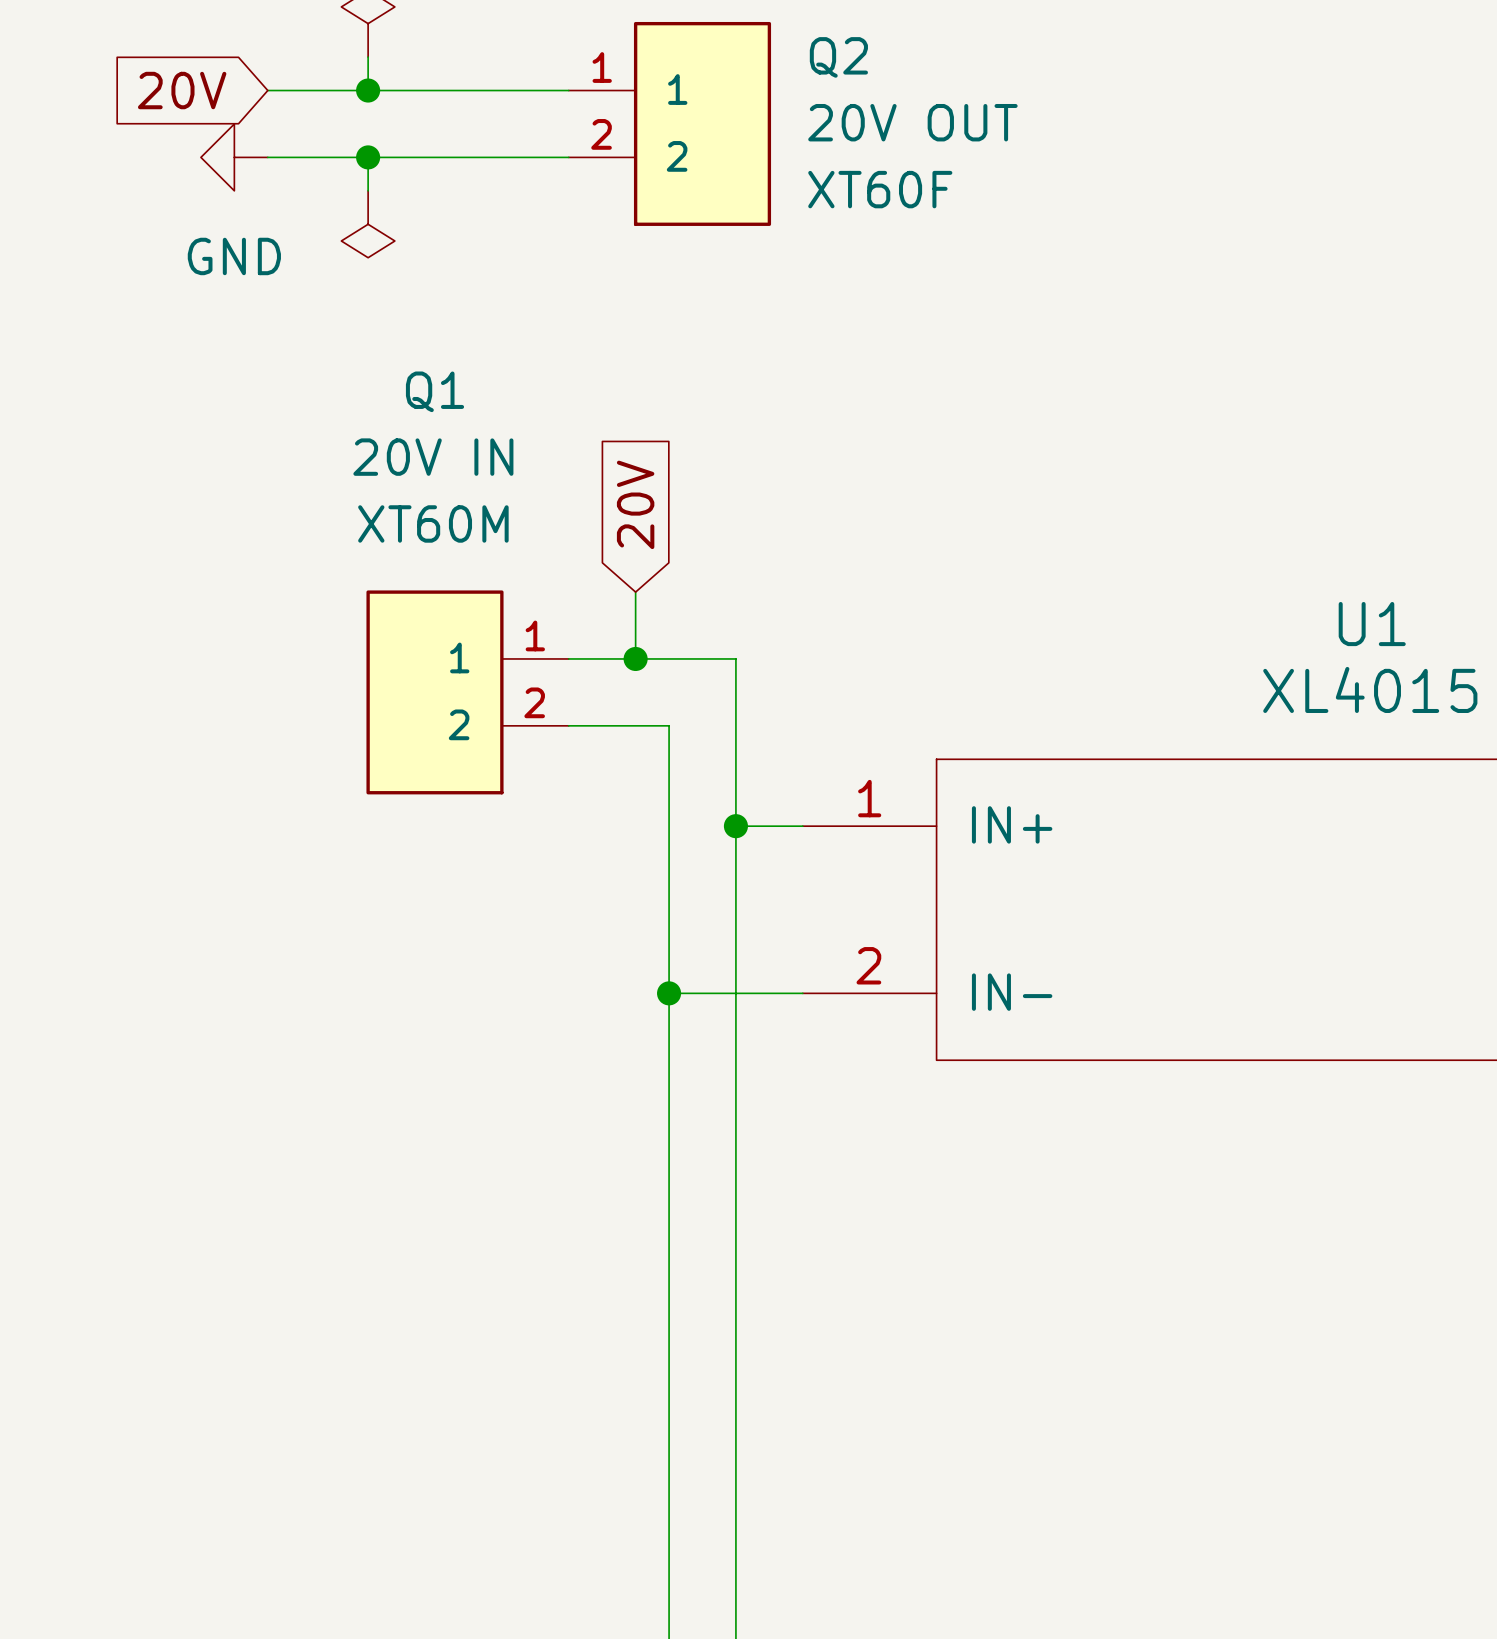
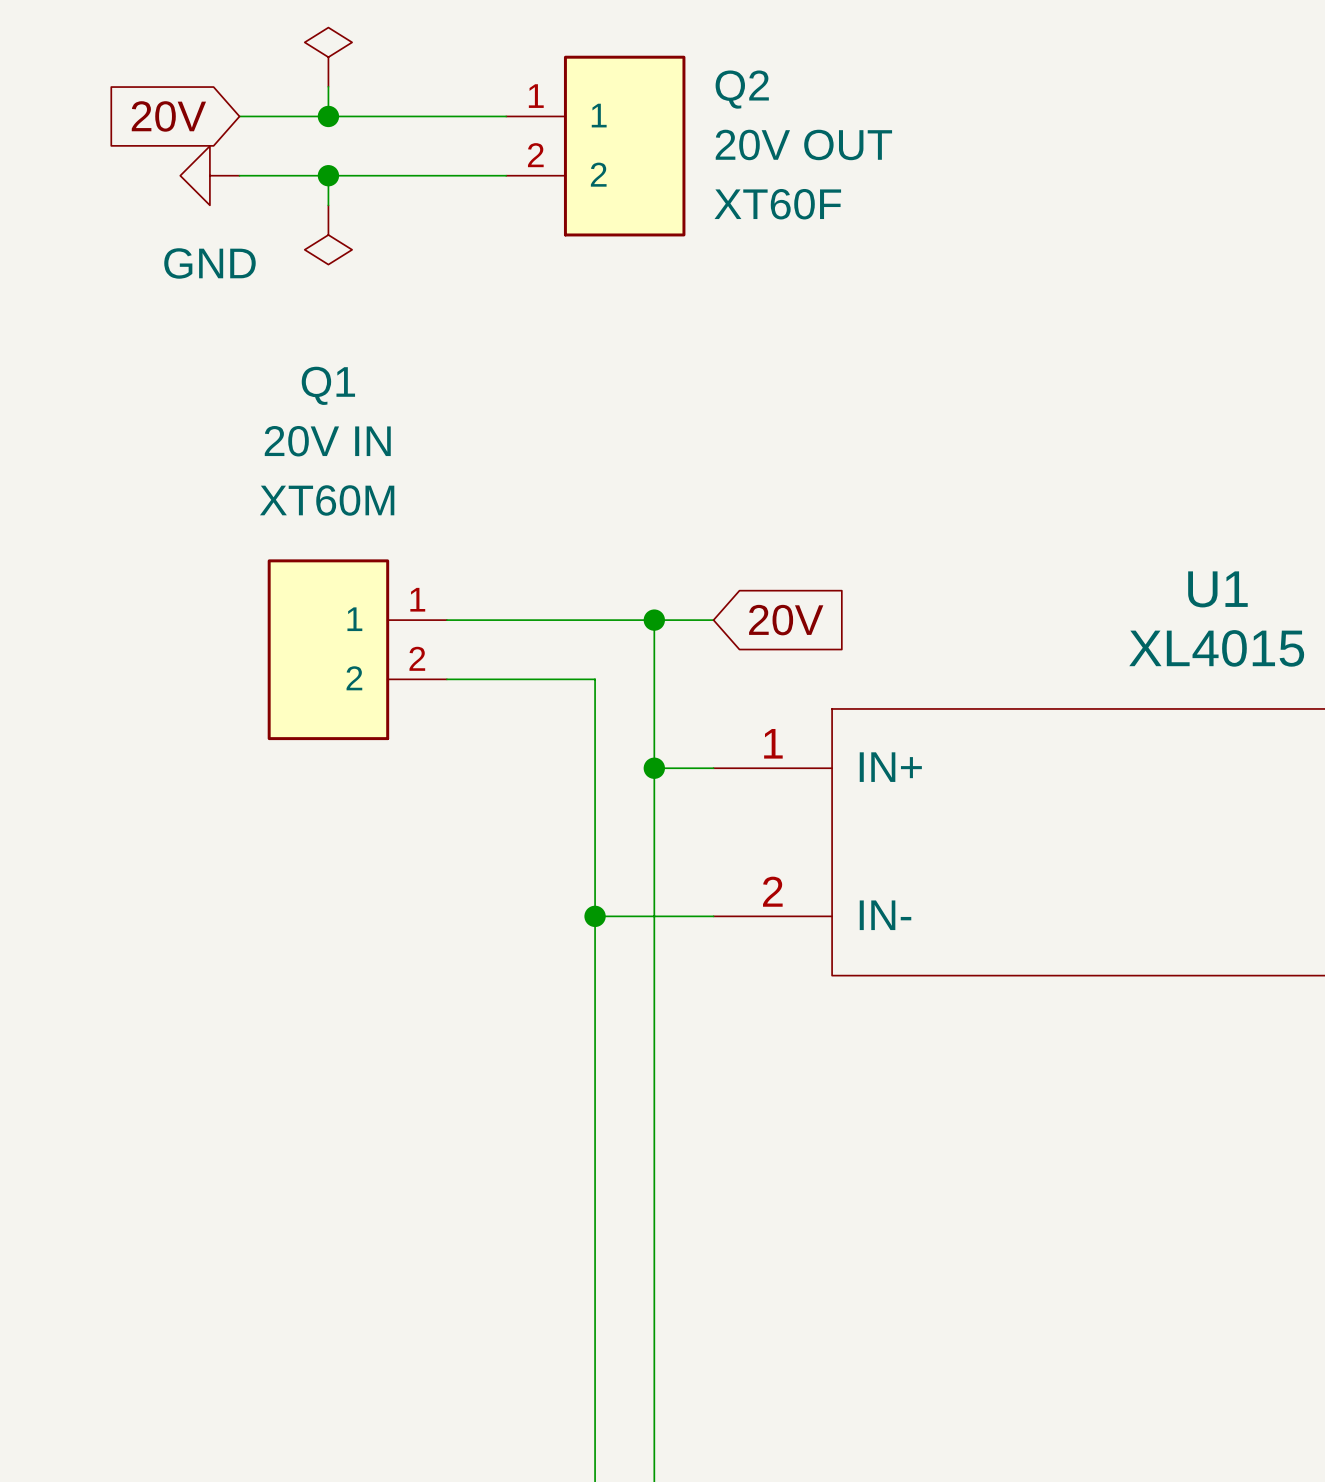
global label rotation: 0° (635, 504) -> 90° clockwise (786, 620)
global label position: 20V (635, 504) -> 20V (786, 620)
wire: (635, 592) (635, 658) -> none
junction position: (635, 658) -> (654, 620)
wire: none -> (654, 620) (713, 620)
Q1 position: (467, 692) -> (357, 649)

